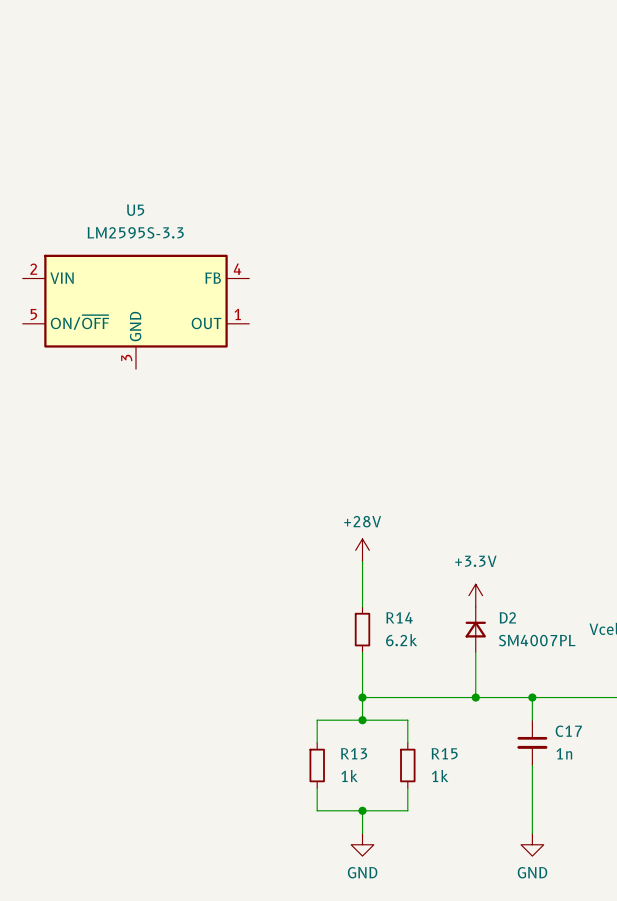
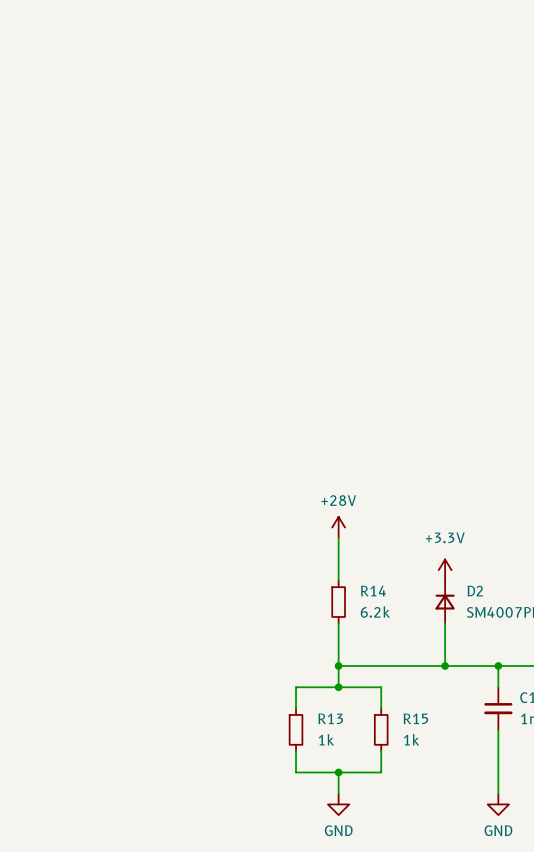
U5: LM2595S-3.3 (135, 311) -> none

